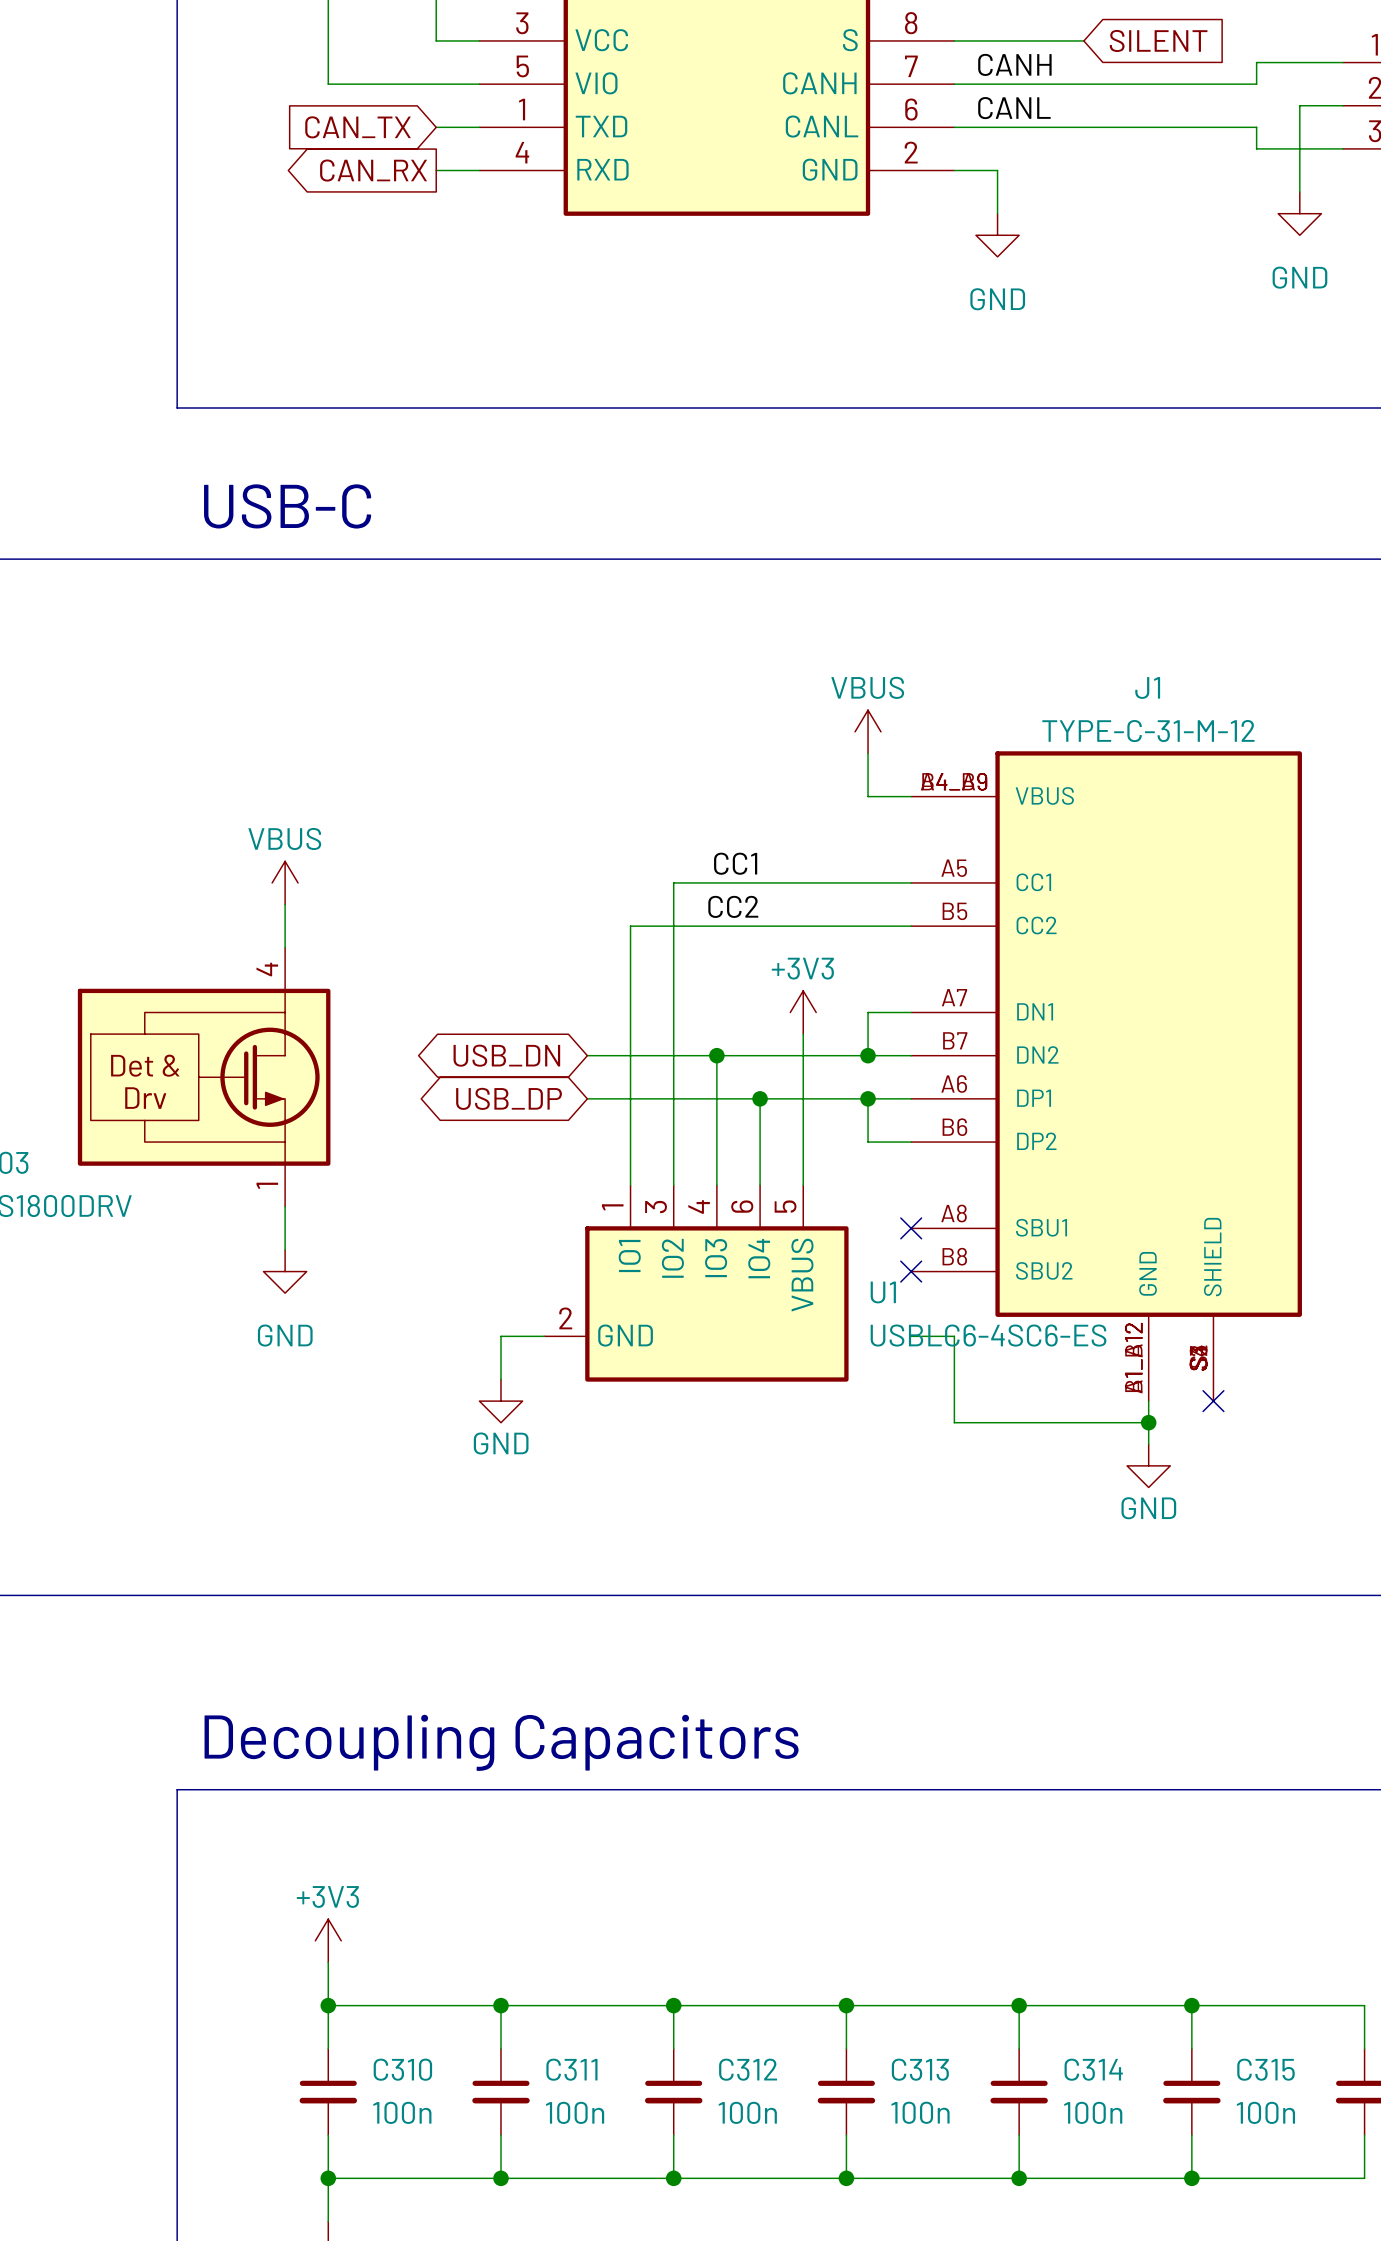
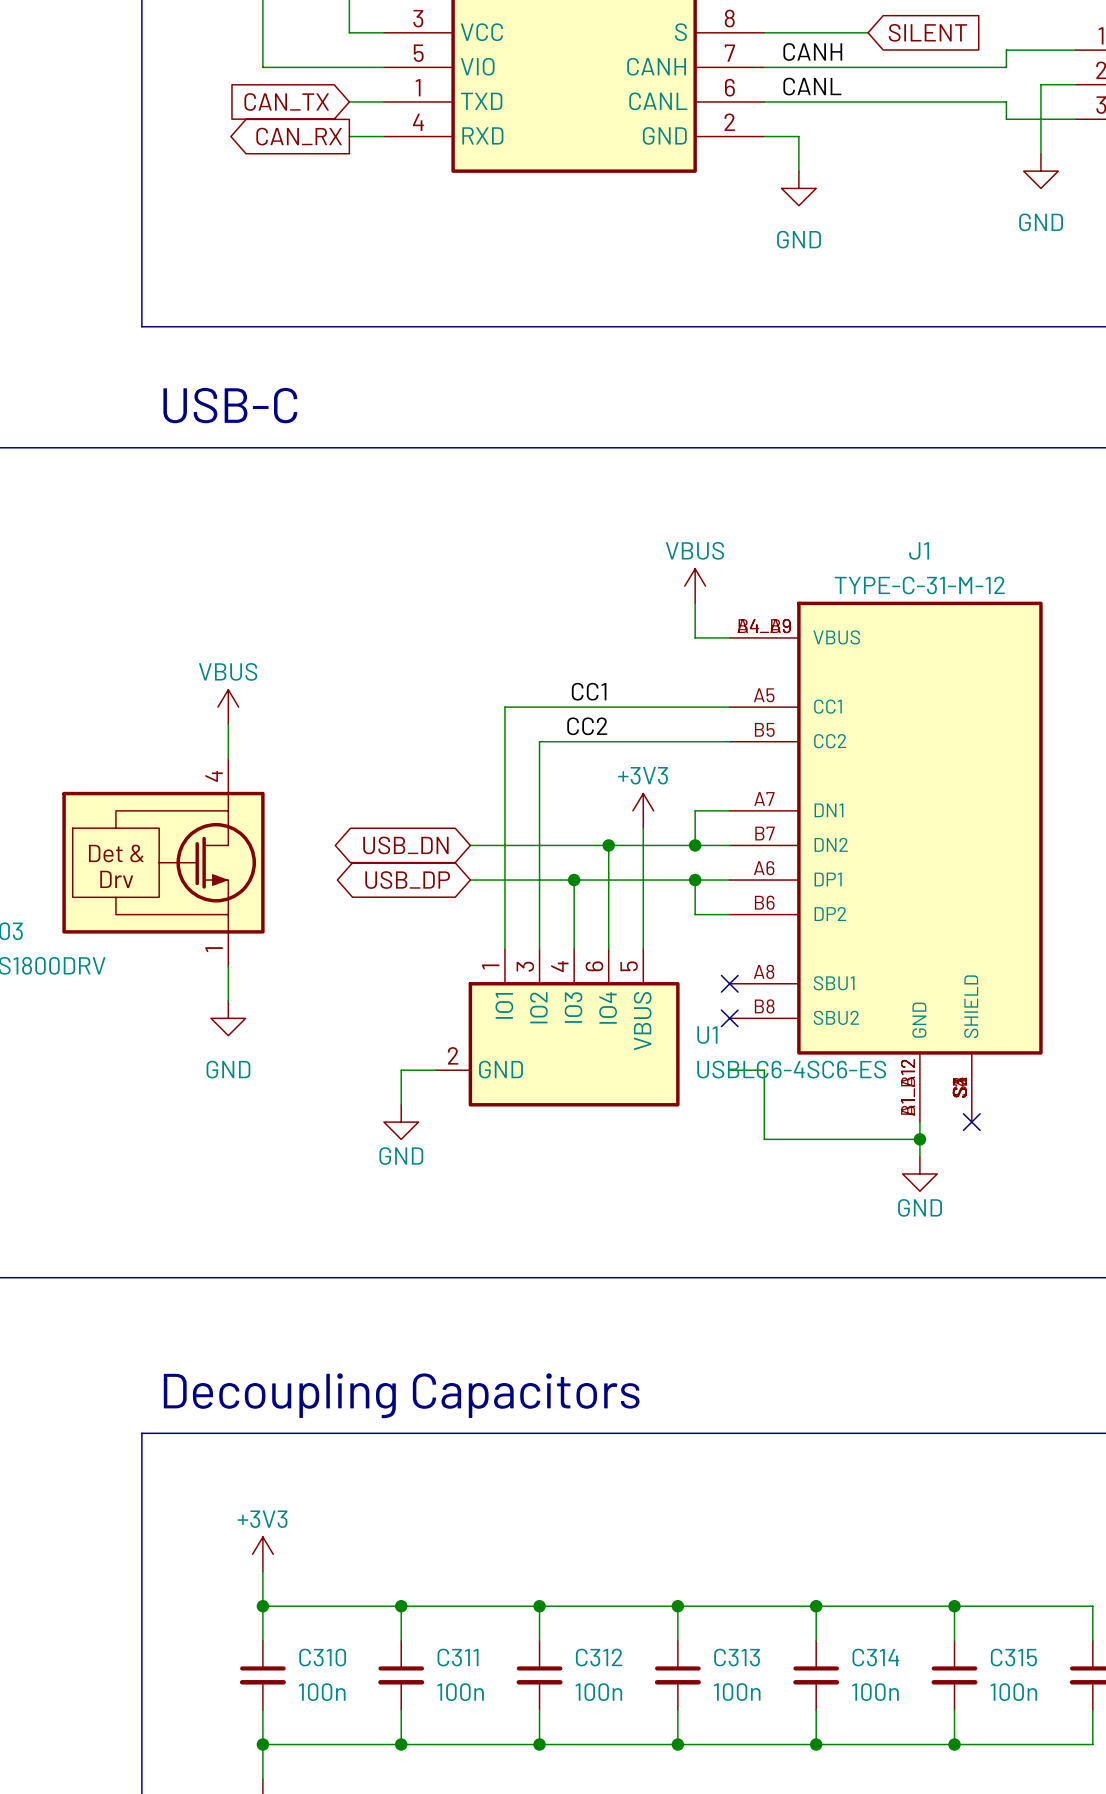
wire: (673, 882) (673, 926) (630, 926) -> (539, 707) (504, 707) (504, 741)
wire: (716, 1055) (716, 1098) -> (608, 845) (608, 880)
junction: (716, 1055) -> none
junction: none -> (608, 845)
junction: none -> (574, 880)
junction: (760, 1098) -> none

